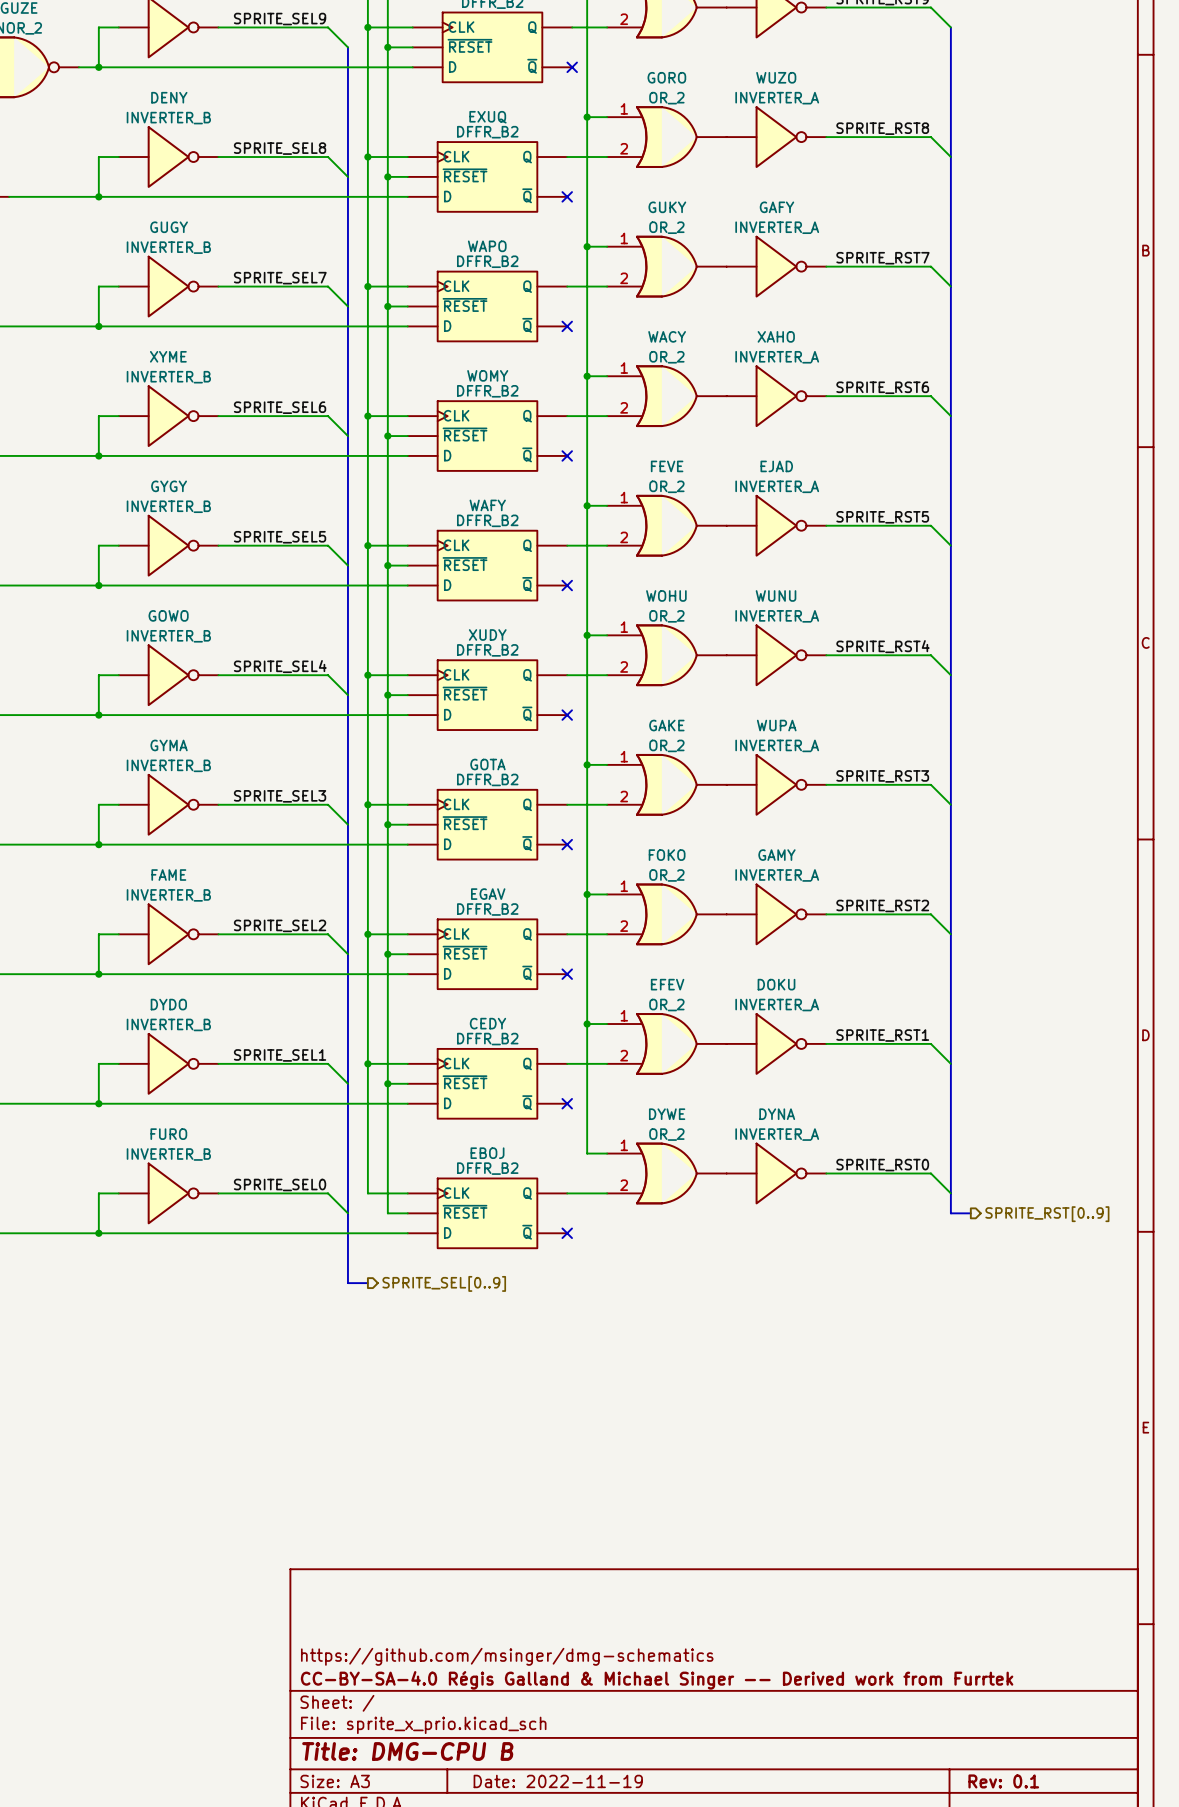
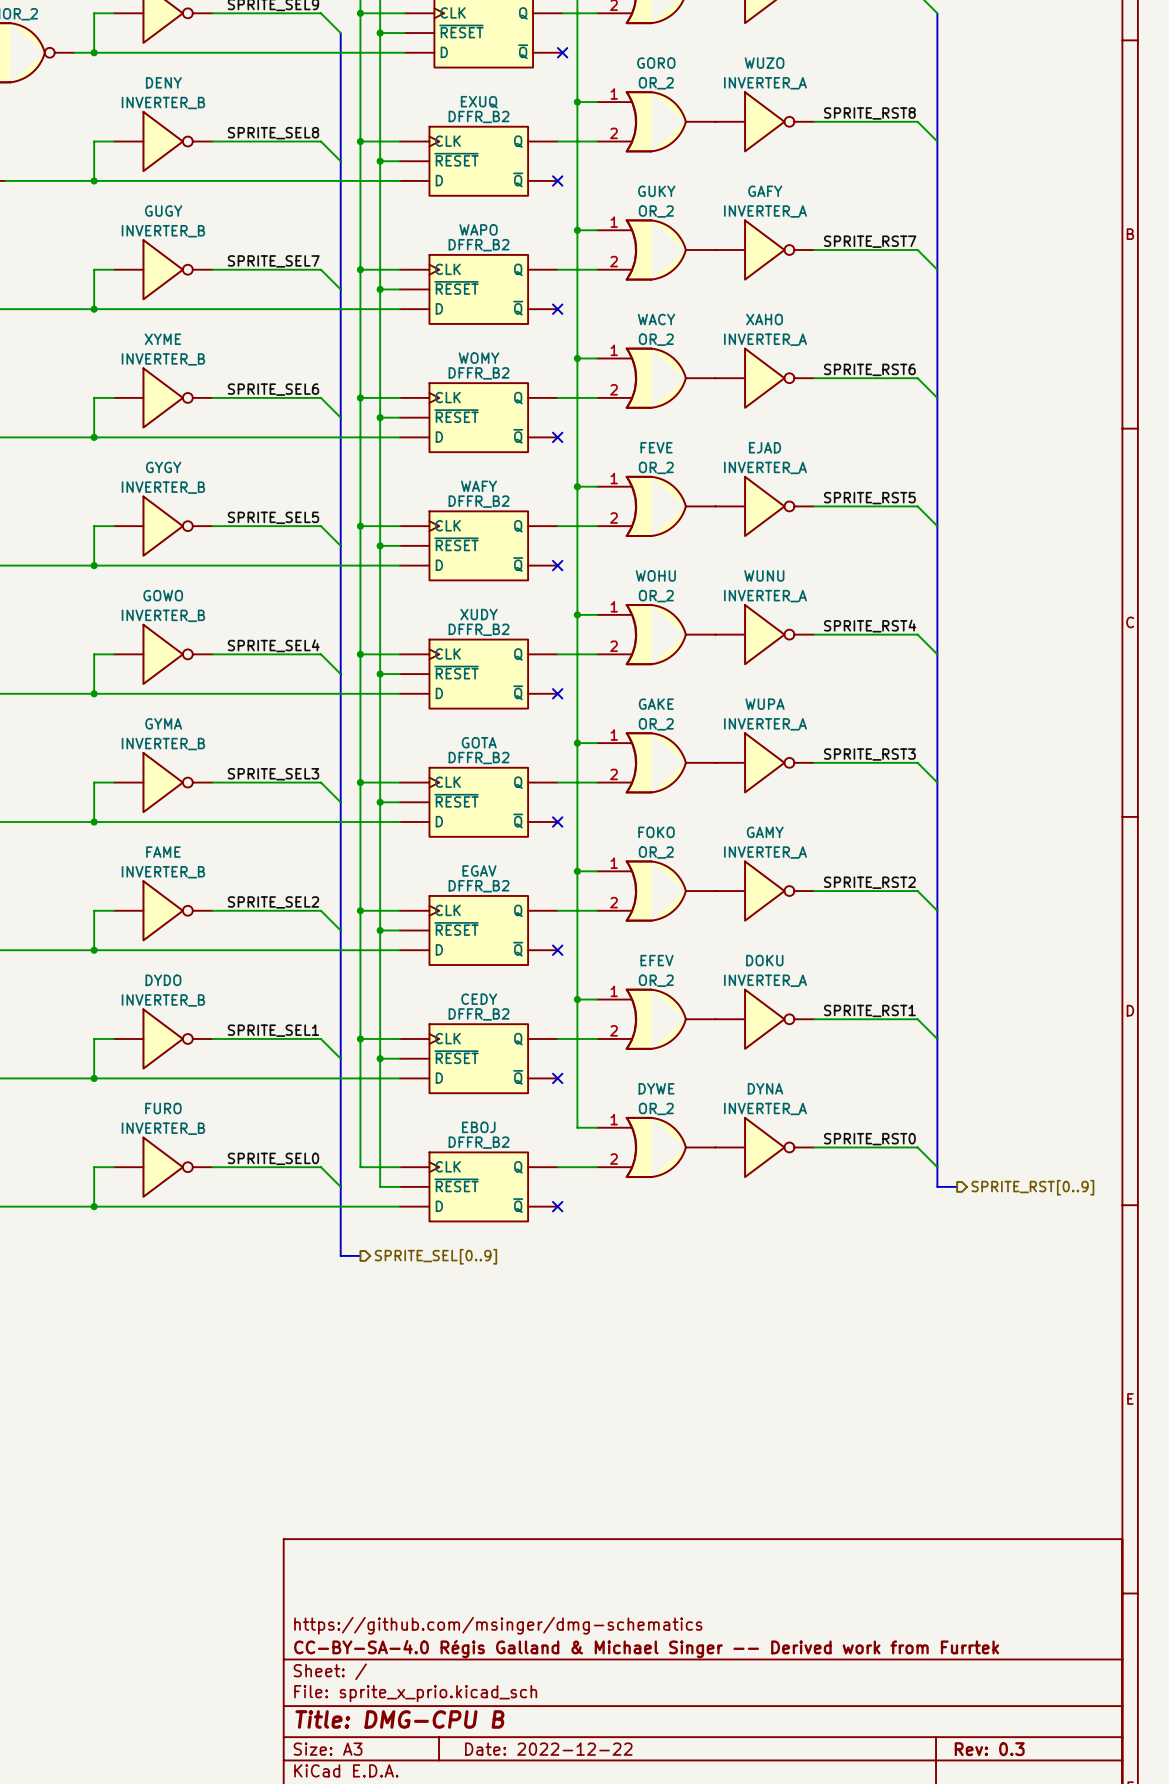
title block: Date: 2022-11-19 (558, 1781) -> Date: 2022-12-22 (548, 1749)
title block: Rev: 0.1 (1003, 1781) -> Rev: 0.3 (989, 1749)

